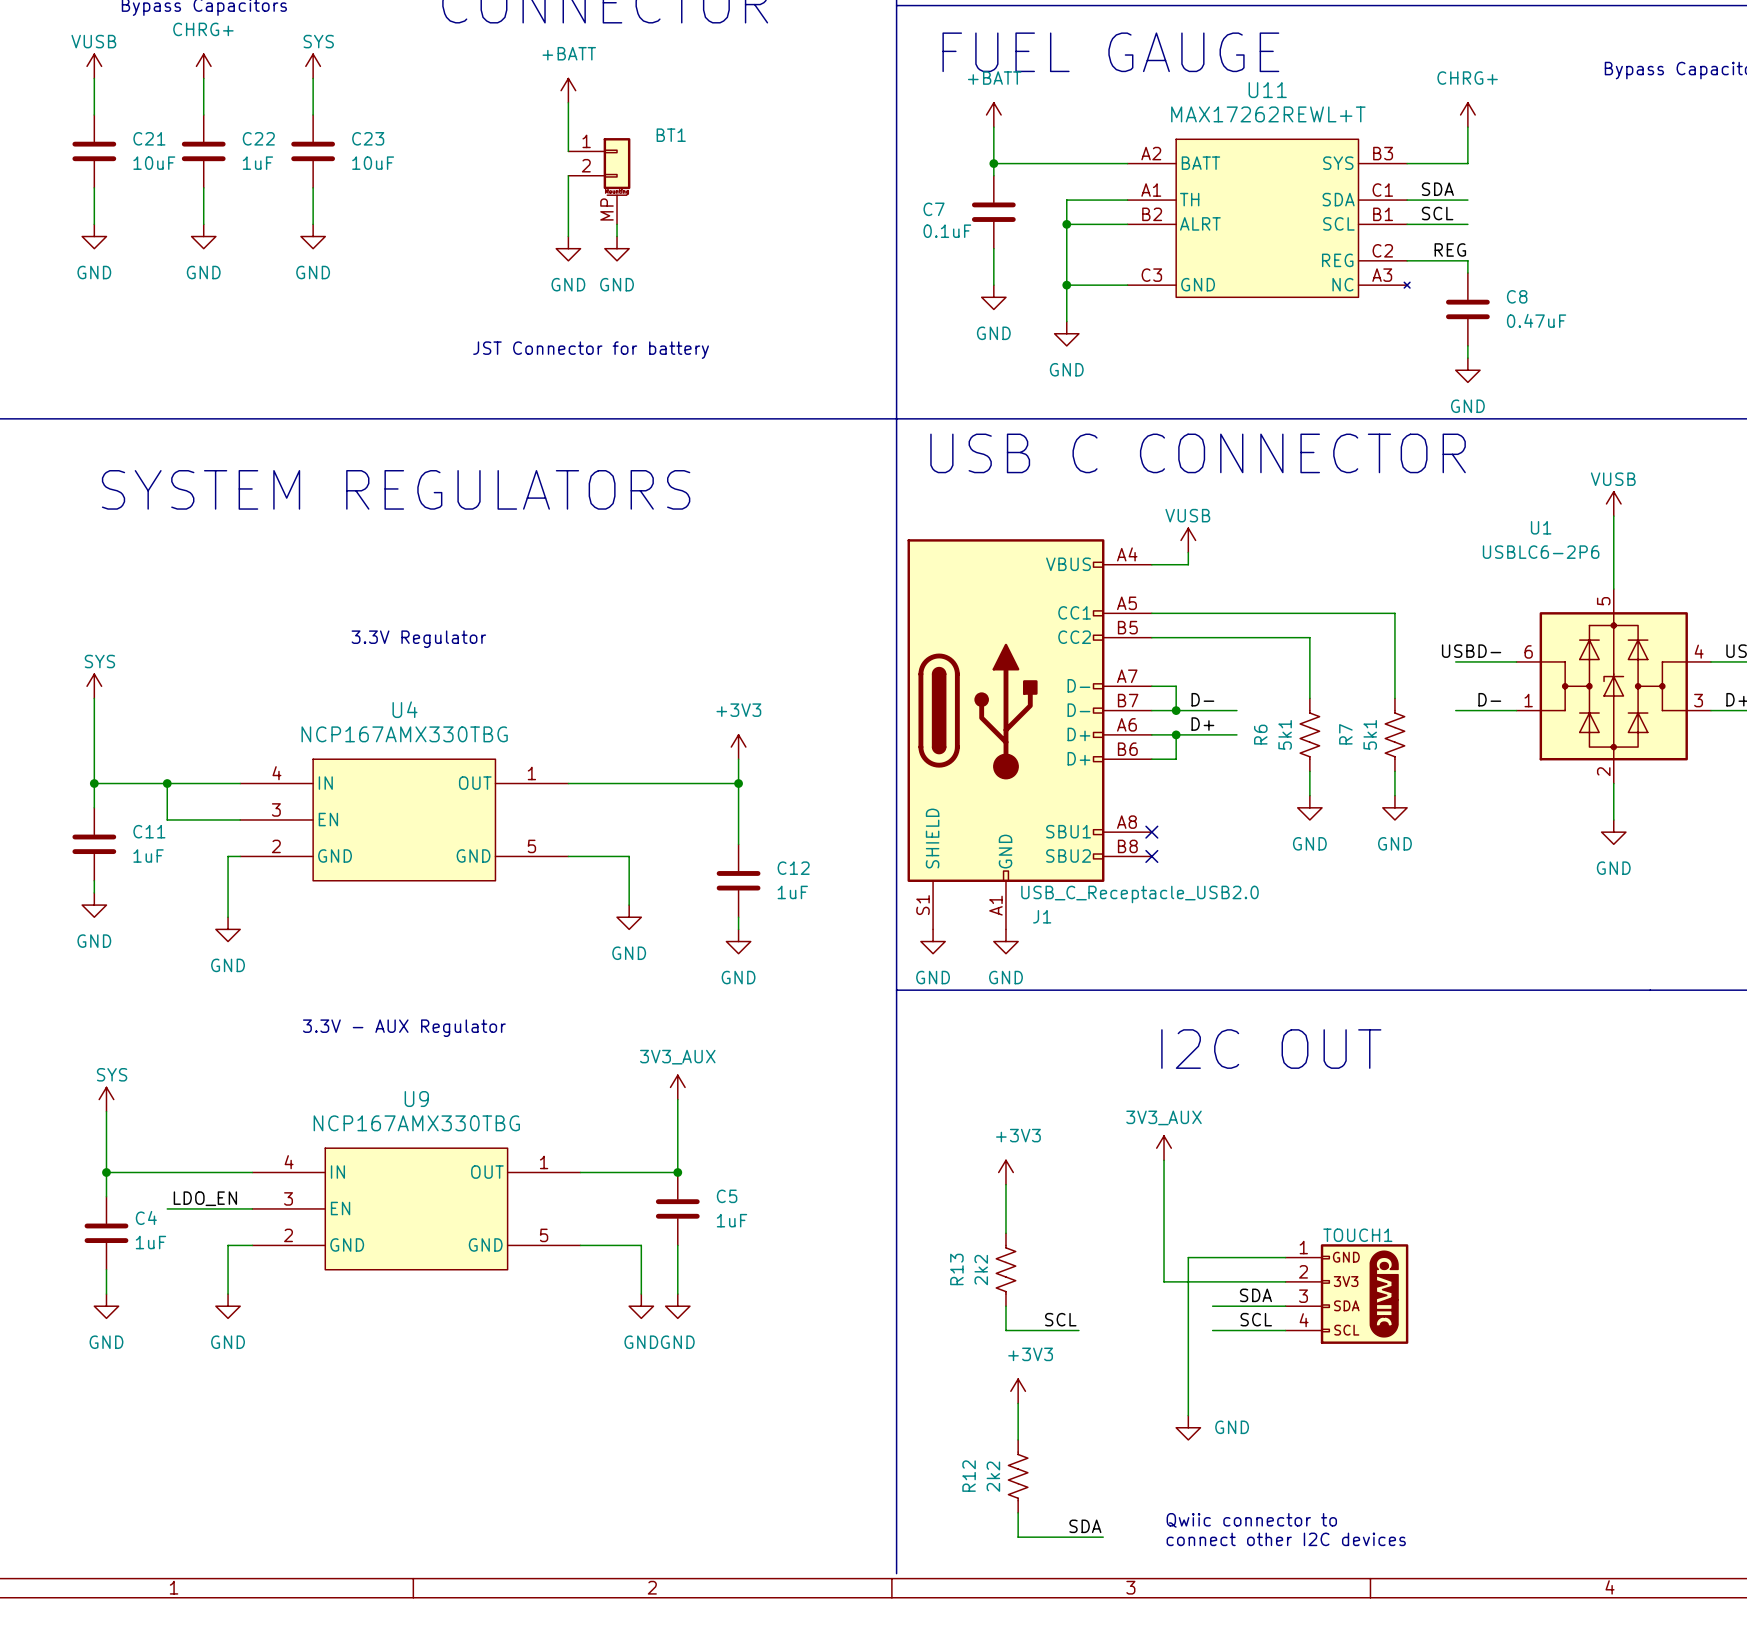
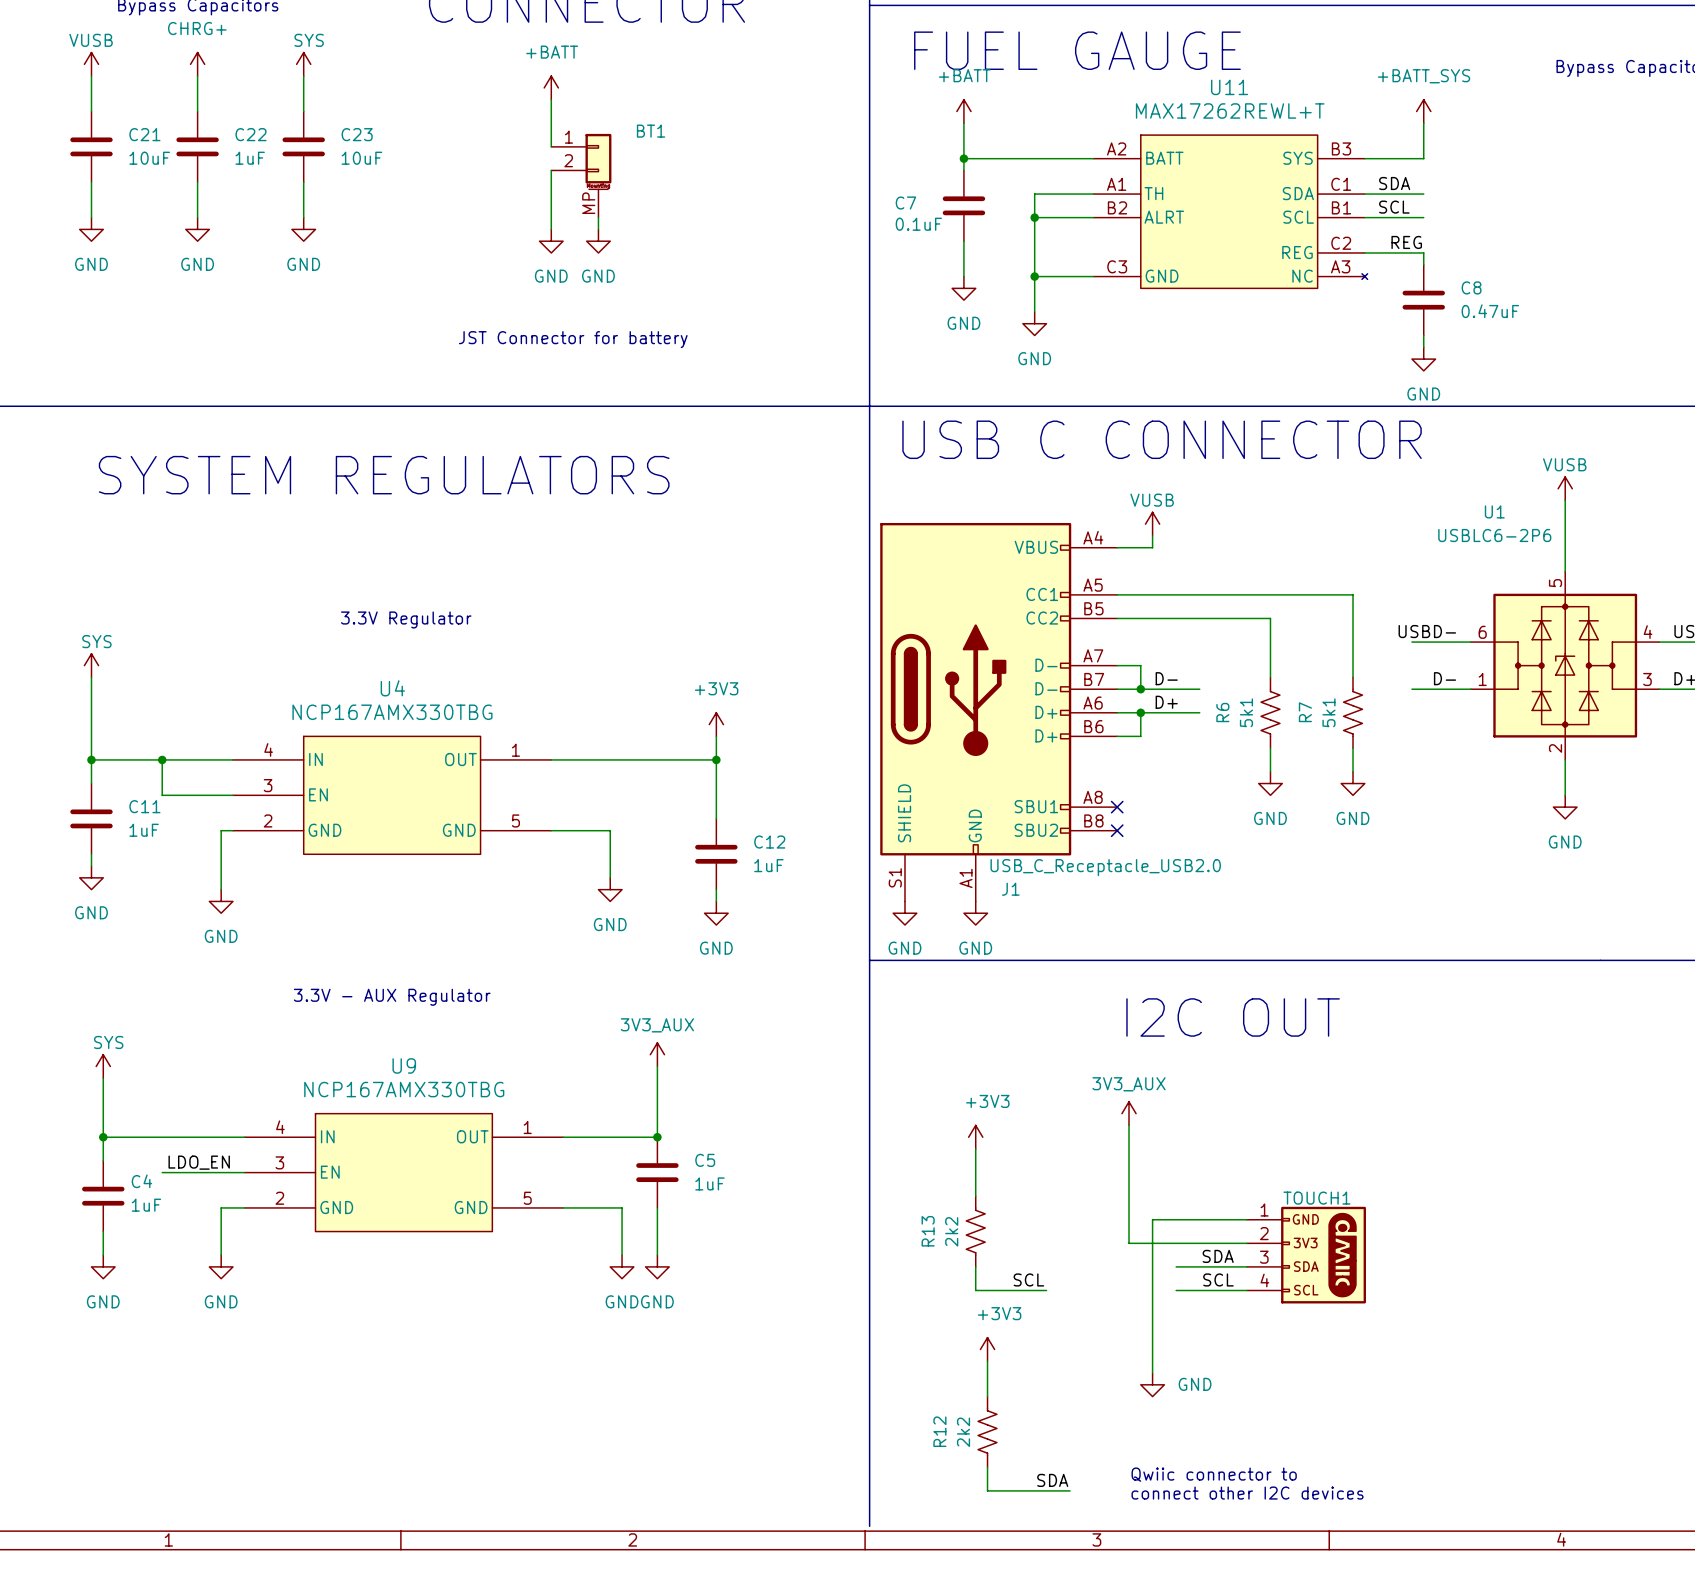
power symbol: CHRG+ (1467, 114) -> +BATT_SYS (1423, 111)

